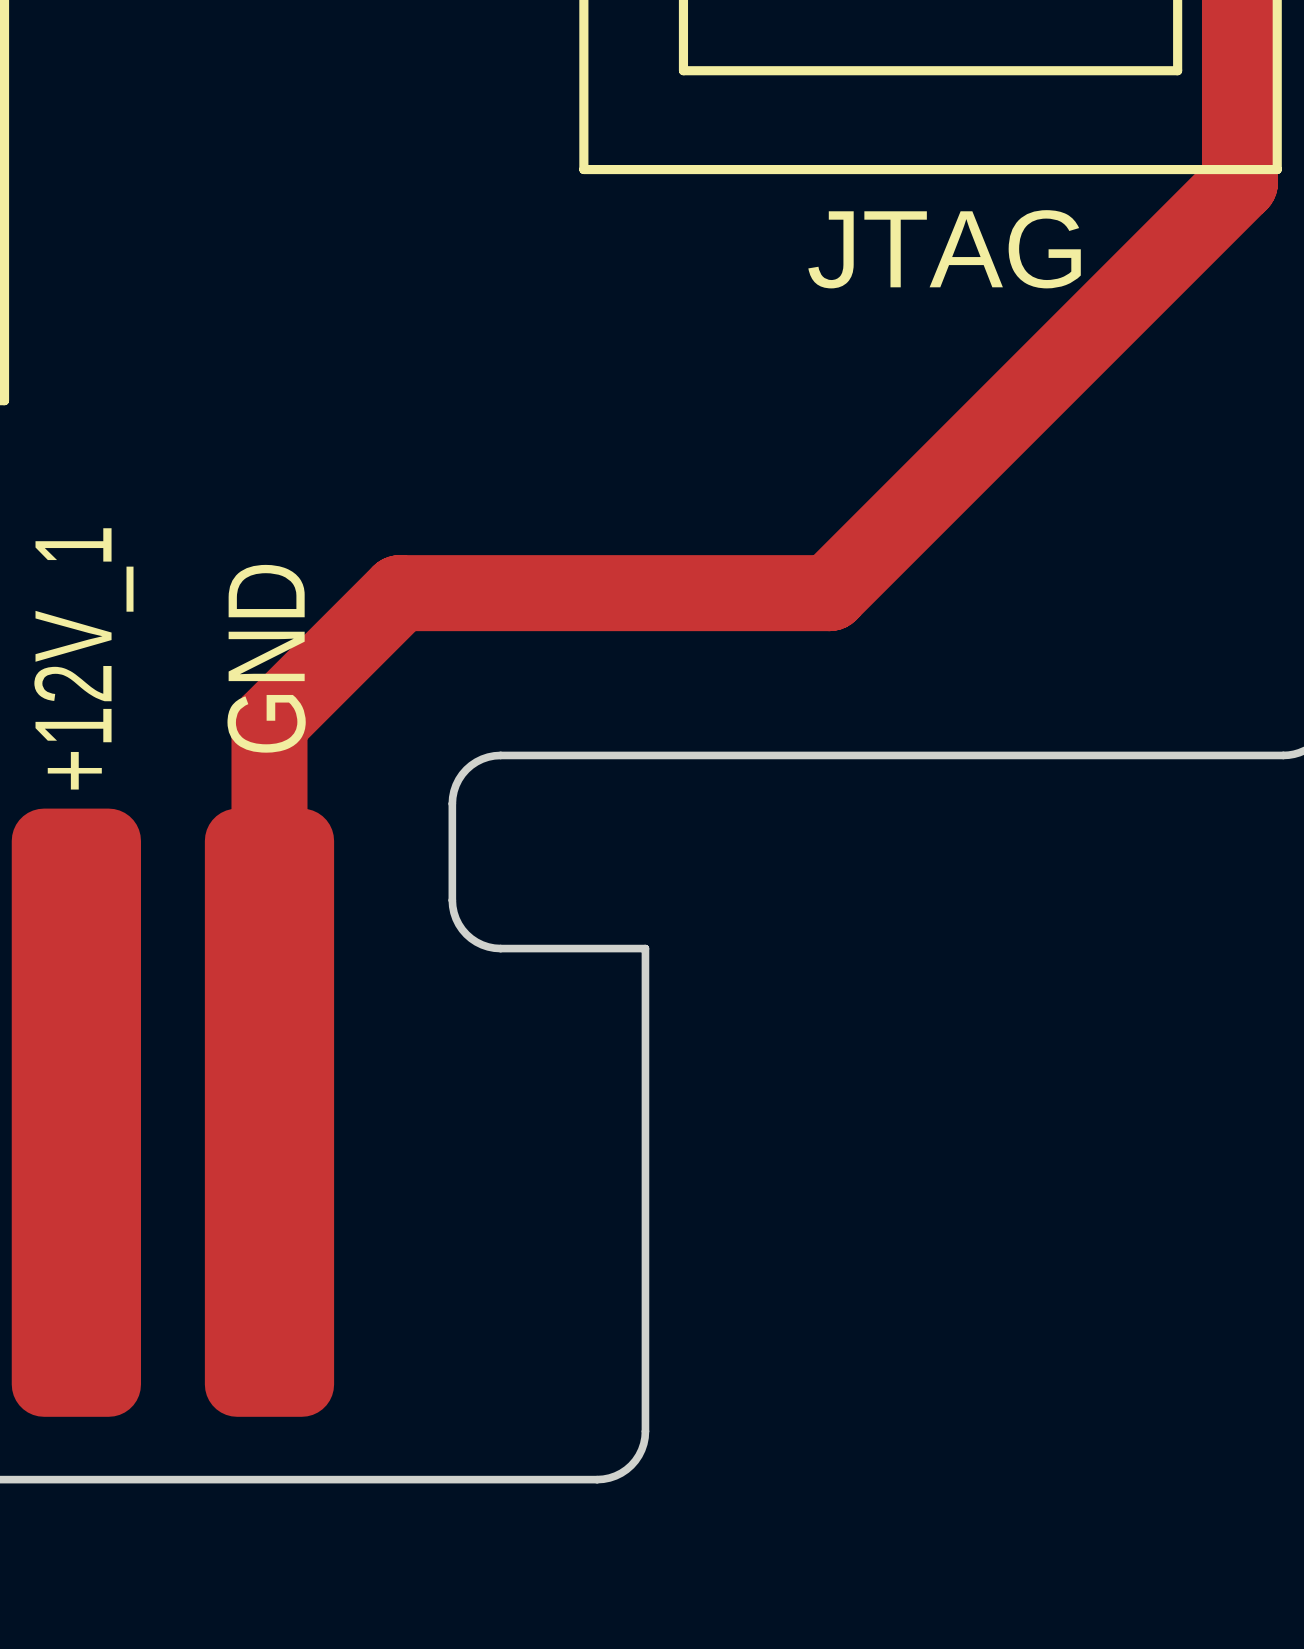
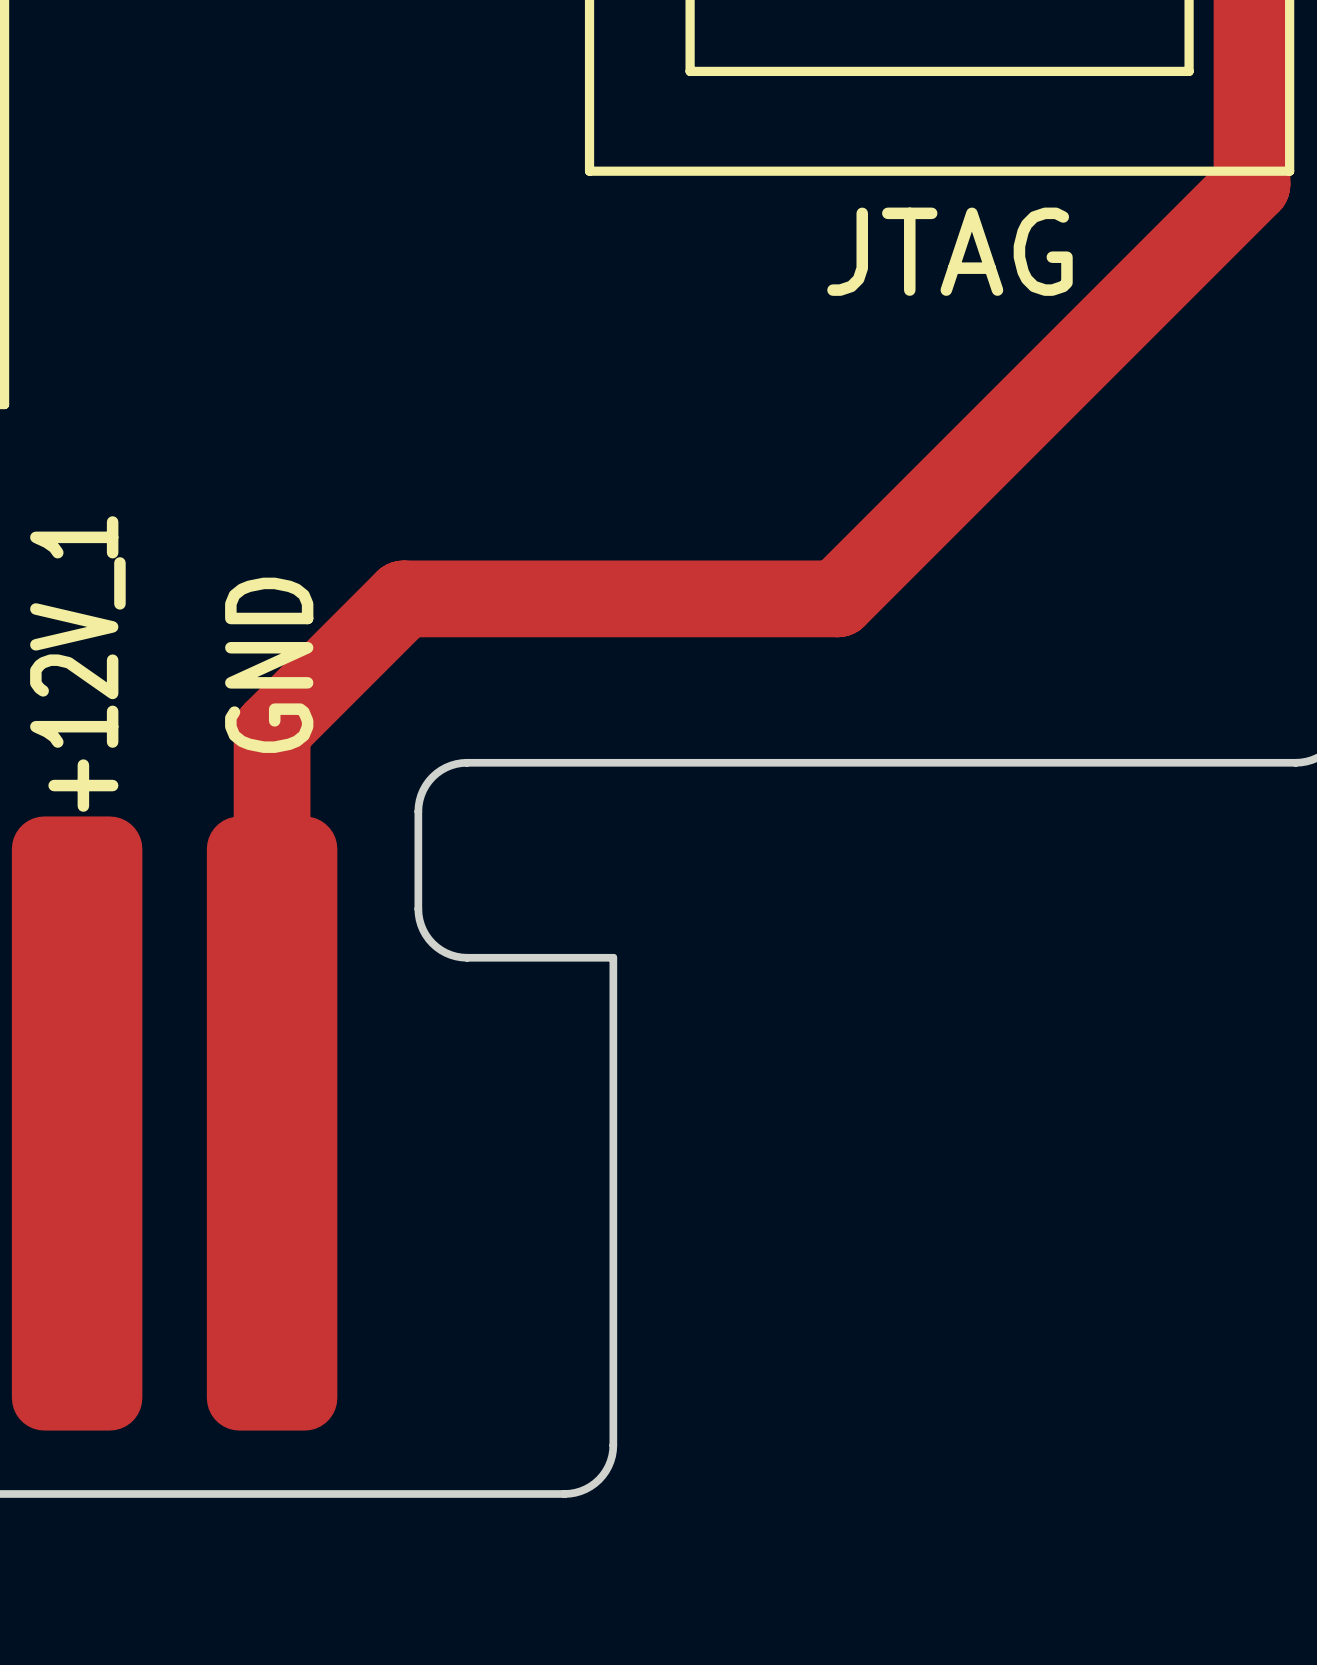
board edge: (500, 755) (482, 759) (466, 769) (456, 785) (452, 803) (453, 912) (458, 924) (471, 938) (482, 944) (500, 948) -> (505, 762) (461, 763) (441, 770) (432, 777) (423, 790) (418, 811) (418, 914) (425, 934) (436, 947) (456, 956) (505, 957)
board edge: (607, 948) (645, 948) (645, 1437) (641, 1449) (635, 1460) (626, 1469) (615, 1475) (597, 1479) (559, 1479) -> (613, 957) (613, 1450) (608, 1466) (594, 1483) (580, 1491) (564, 1493)

